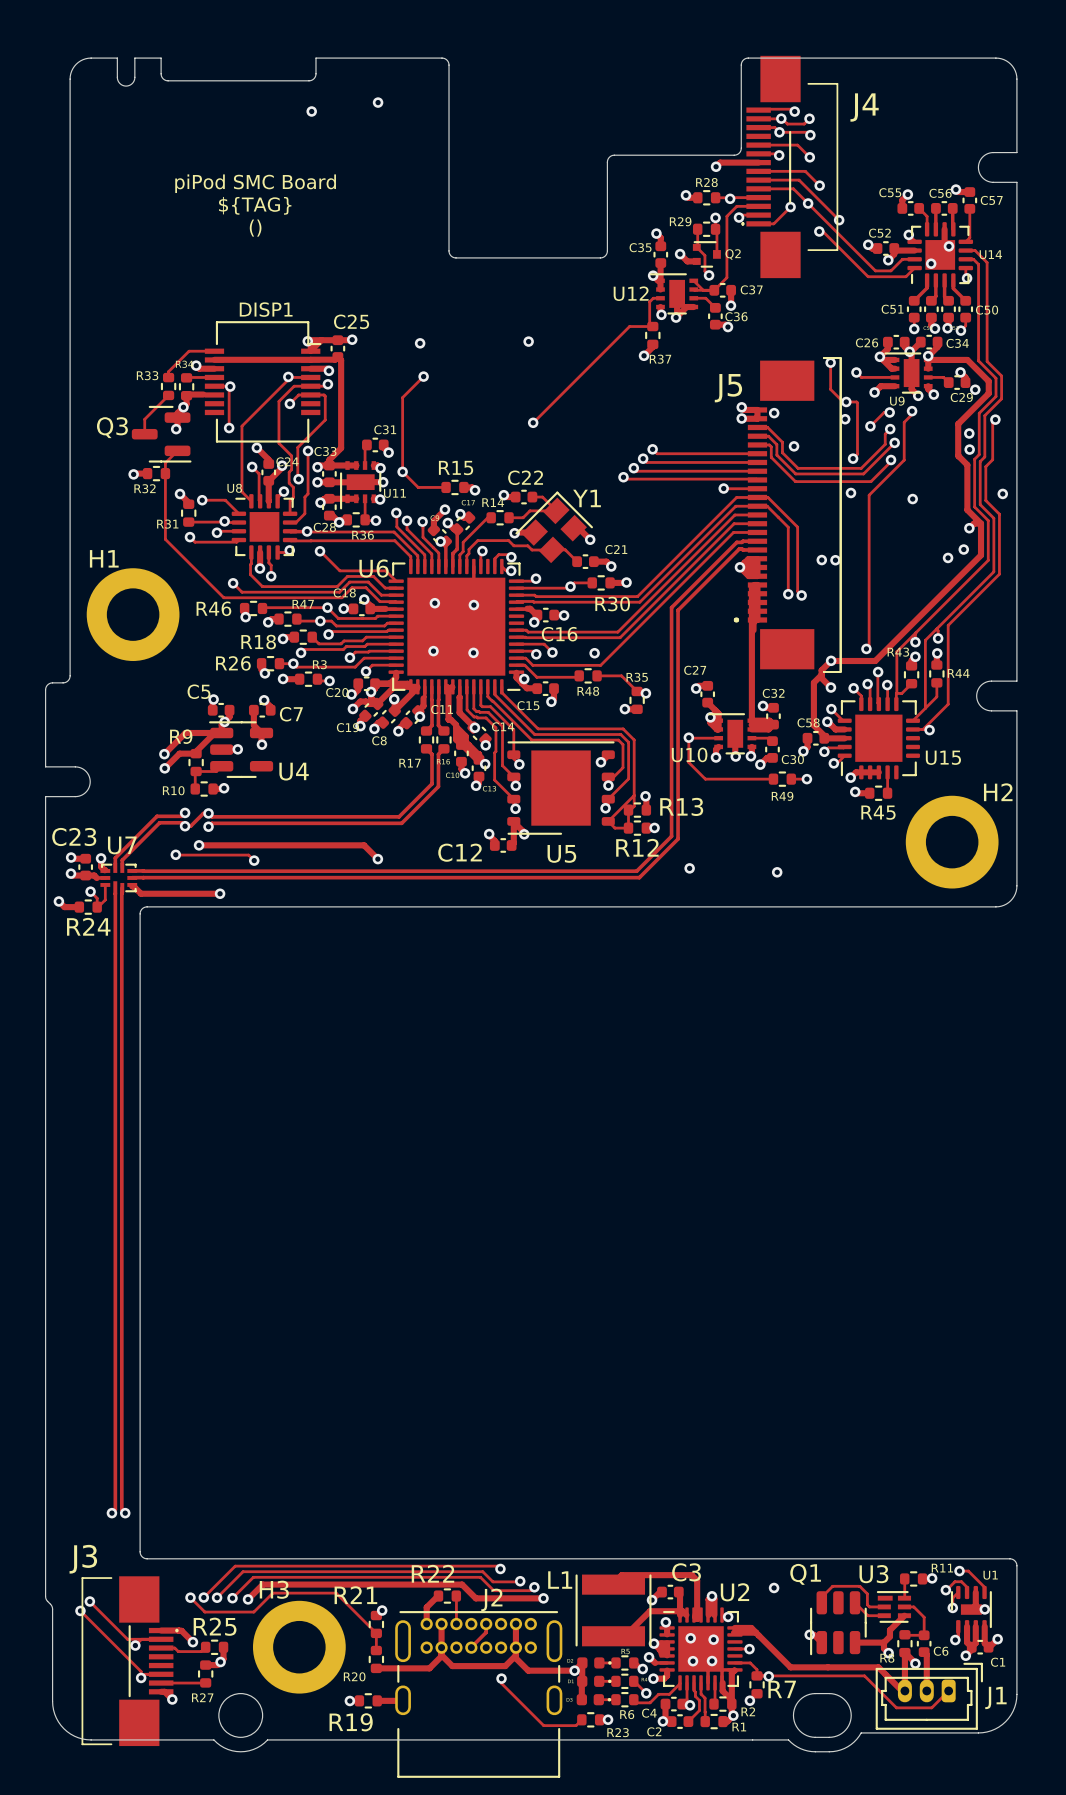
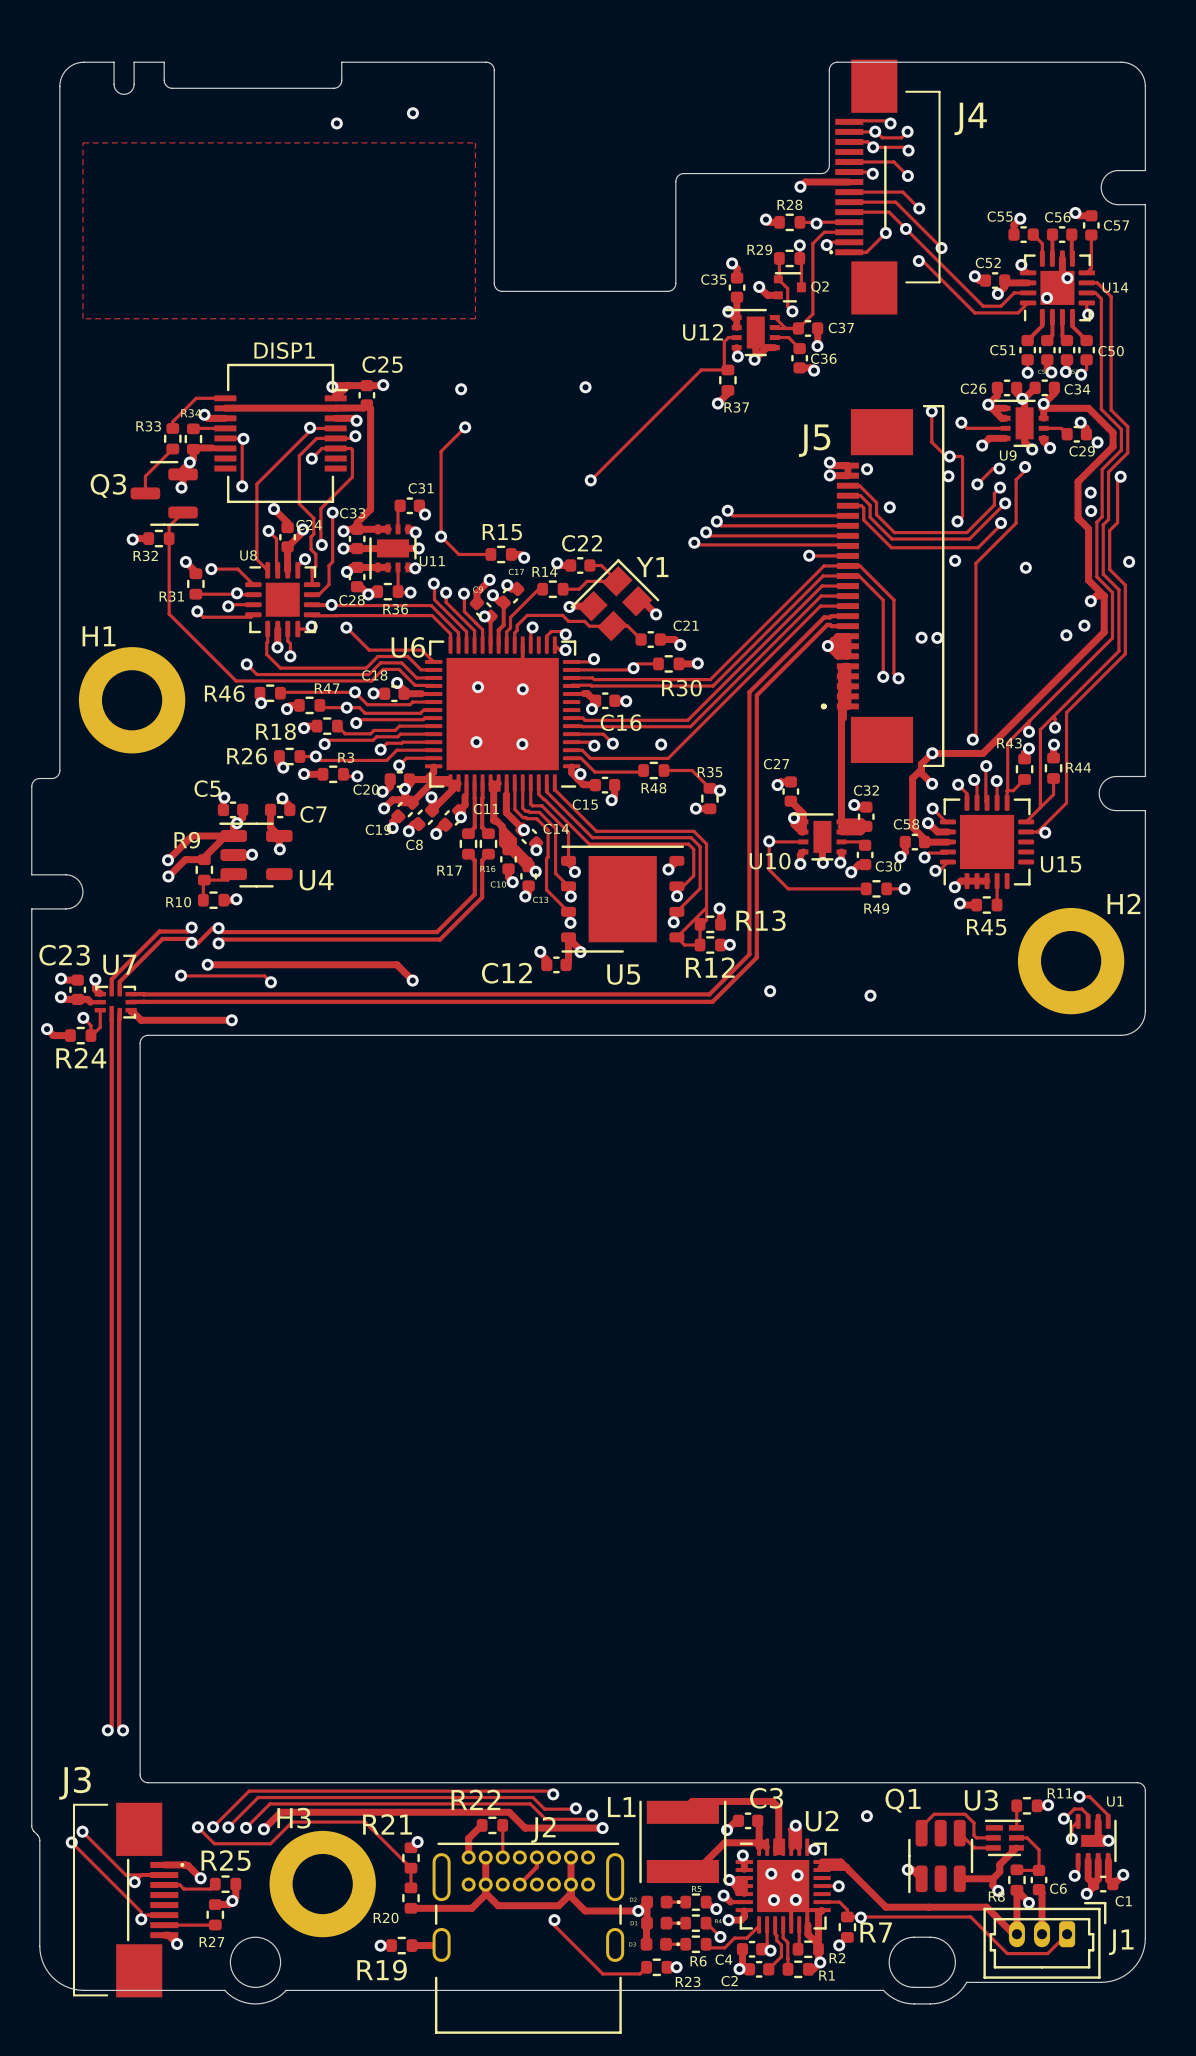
zone outline: none -> (83, 142) (83, 318) (475, 318) (475, 142) (83, 142)
text: piPod SMC Board (255, 183) -> none
text: ${TAG} (255, 205) -> none
text: () (255, 228) -> none

